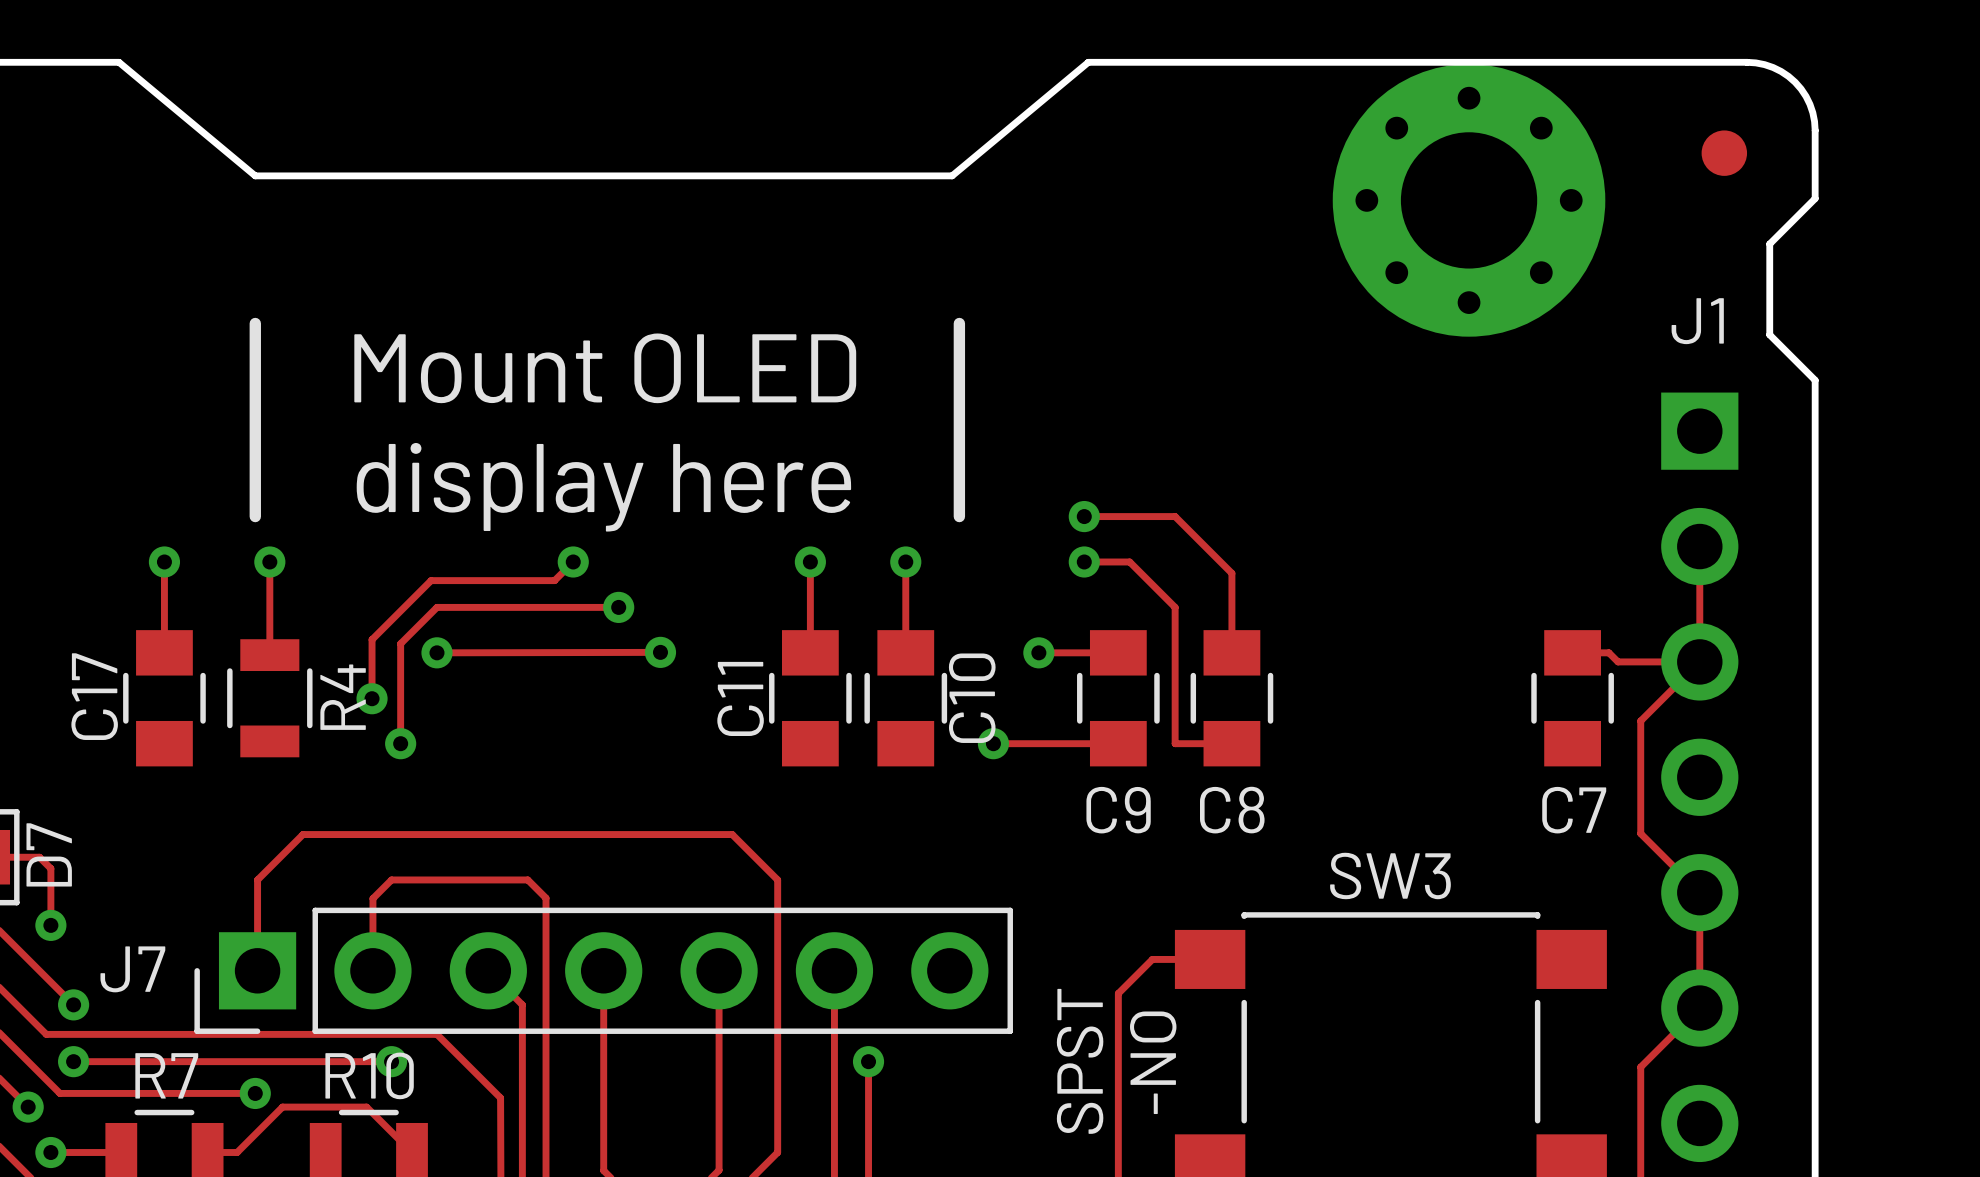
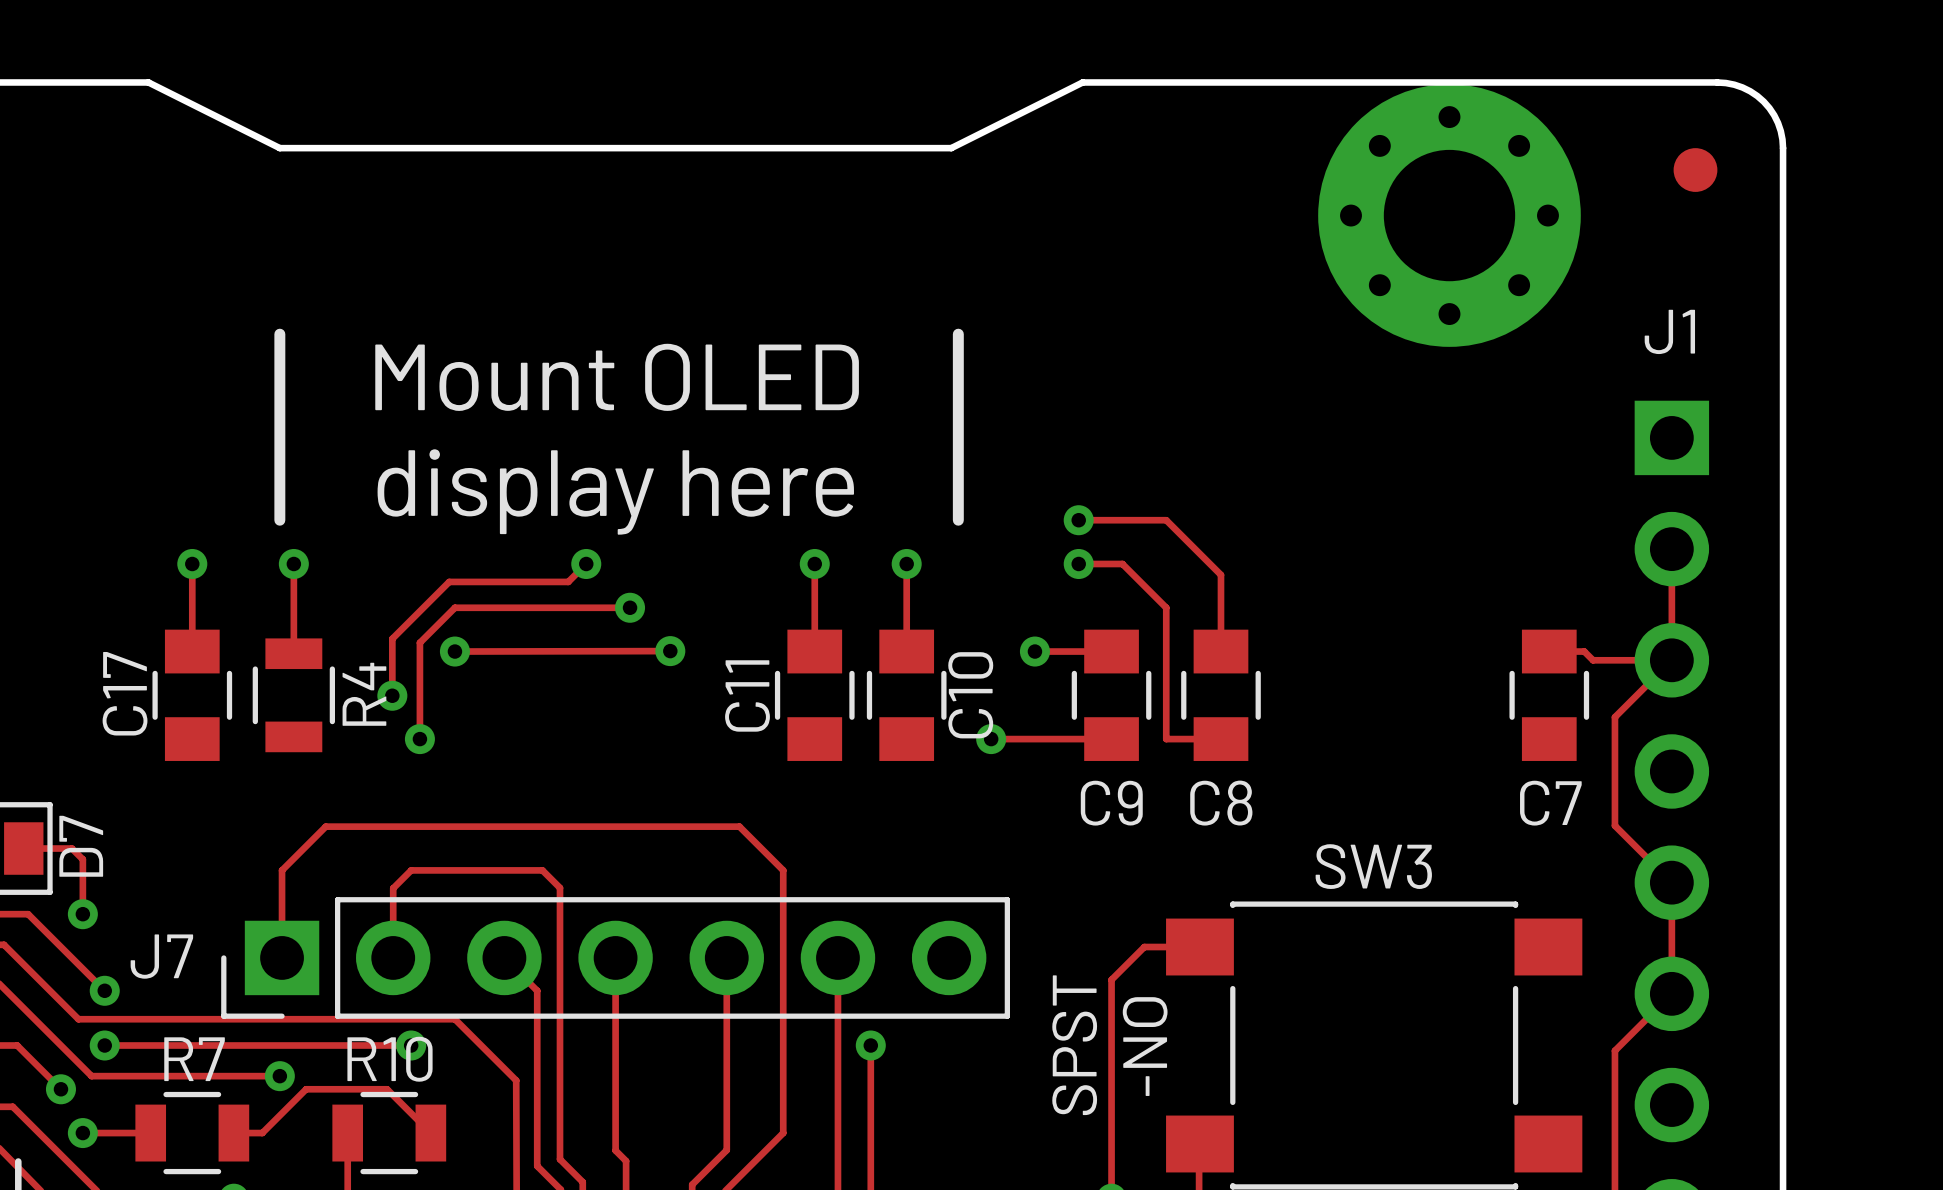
board edge: (119, 62) (255, 175) (952, 175) (1088, 62) -> (148, 82) (279, 148) (951, 148) (1082, 82)
board edge: (1815, 198) (1769, 244) (1769, 334) (1815, 380) -> (1783, 213) (1783, 388)

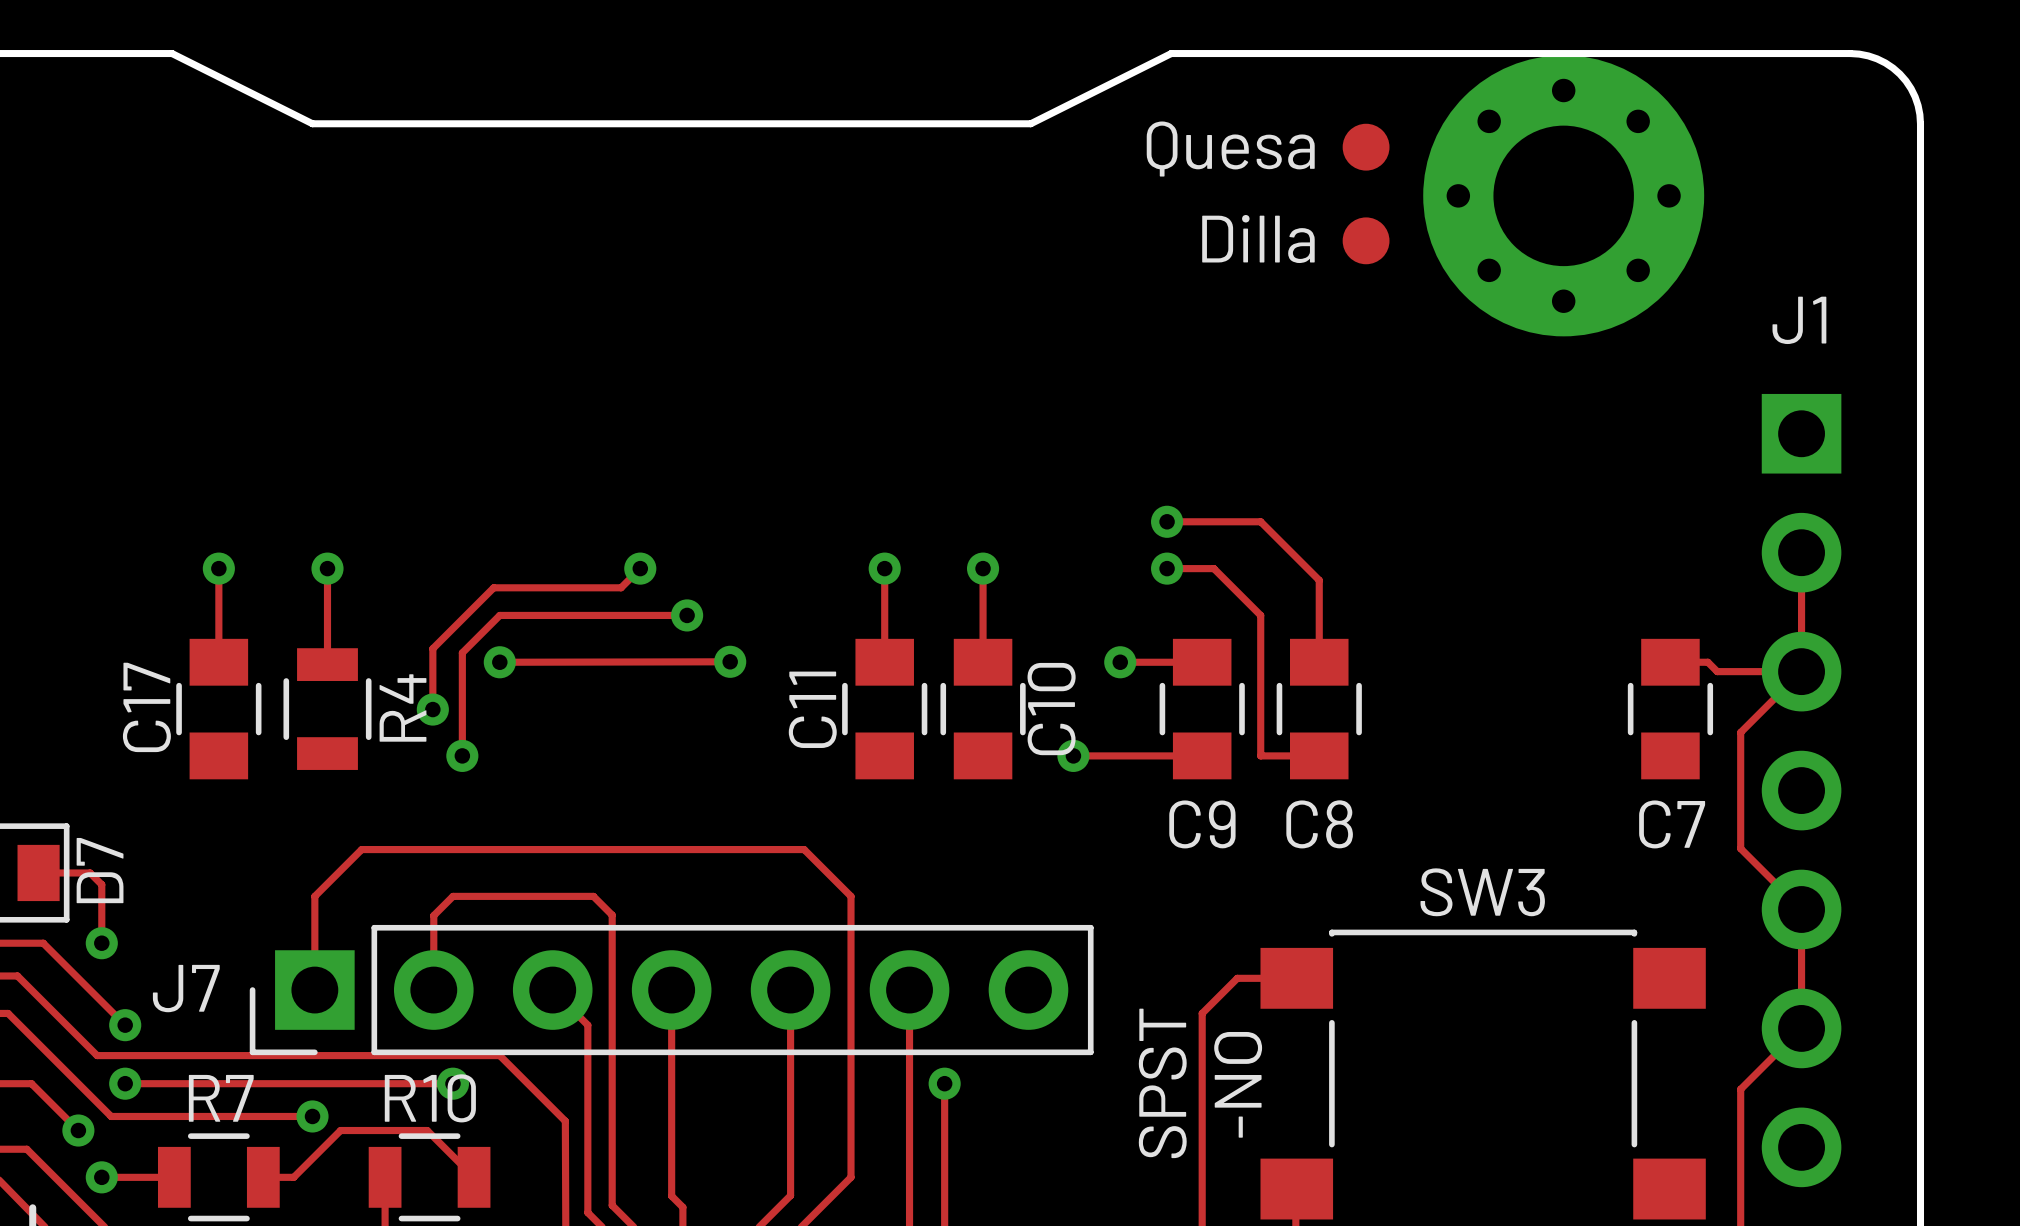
part: none -> (1366, 147)
part: (1695, 170) -> none
text: none -> Quesa (1230, 149)
text: none -> Dilla (1258, 239)
part: none -> (1366, 240)
line: (279, 334) (279, 520) -> none
line: (958, 334) (958, 520) -> none
text: Mount OLED (617, 377) -> none
text: display here (615, 491) -> none

